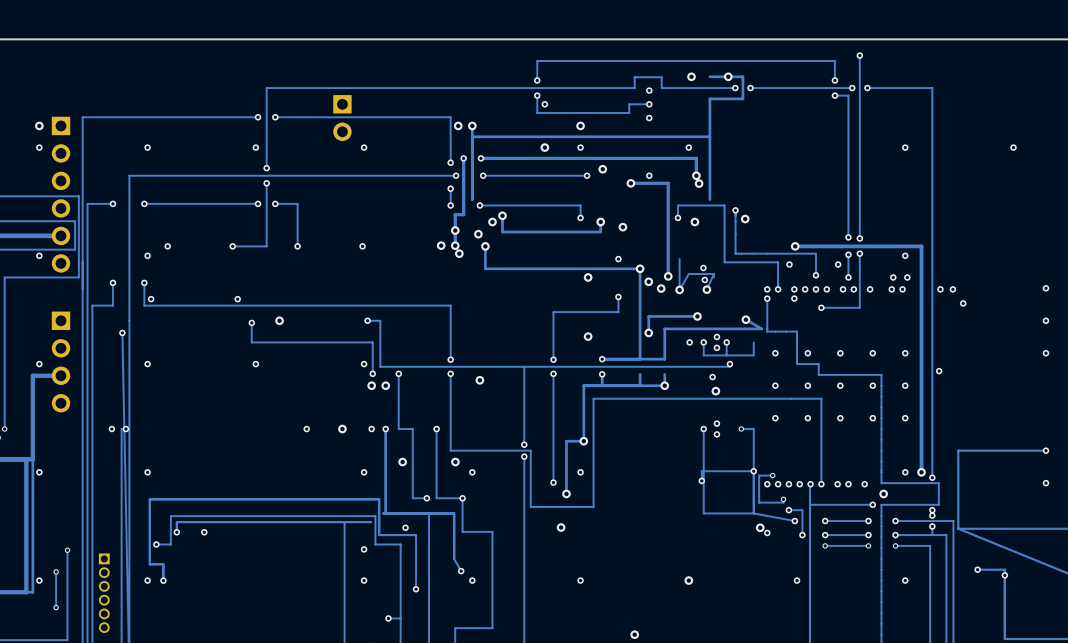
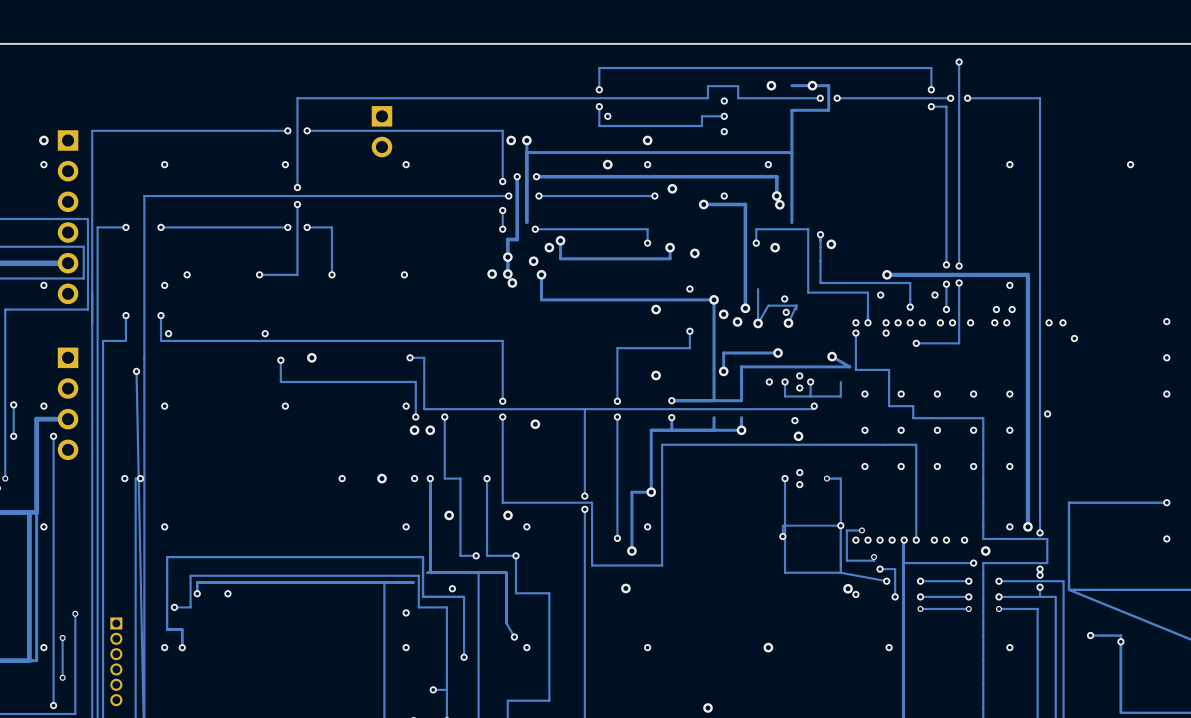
track: none -> (13, 404) (13, 436)
via: none -> (13, 404)
via: none -> (13, 436)
track: none -> (53, 436) (53, 705)
via: none -> (53, 436)
via: none -> (53, 705)

